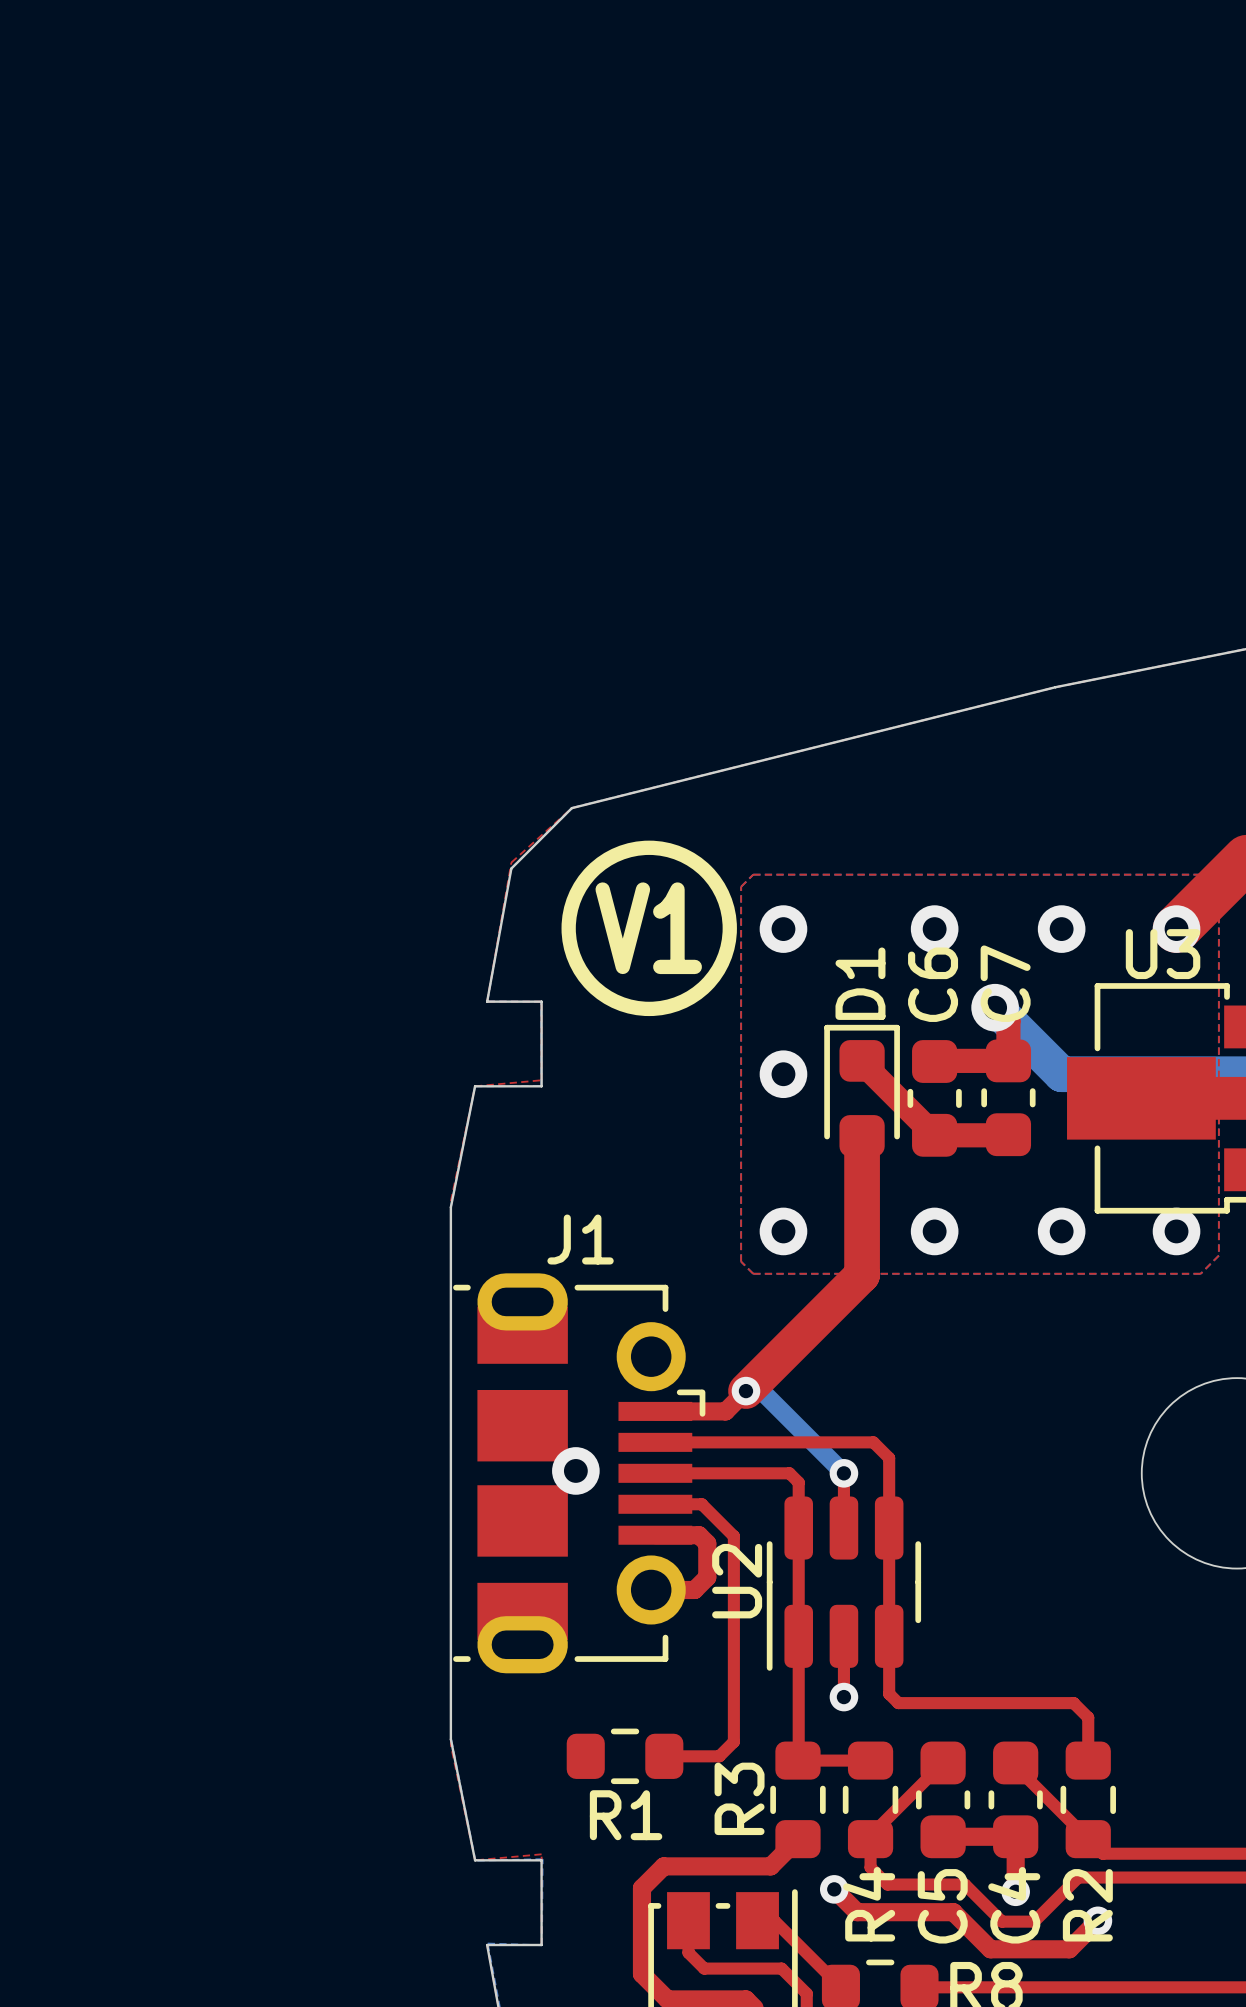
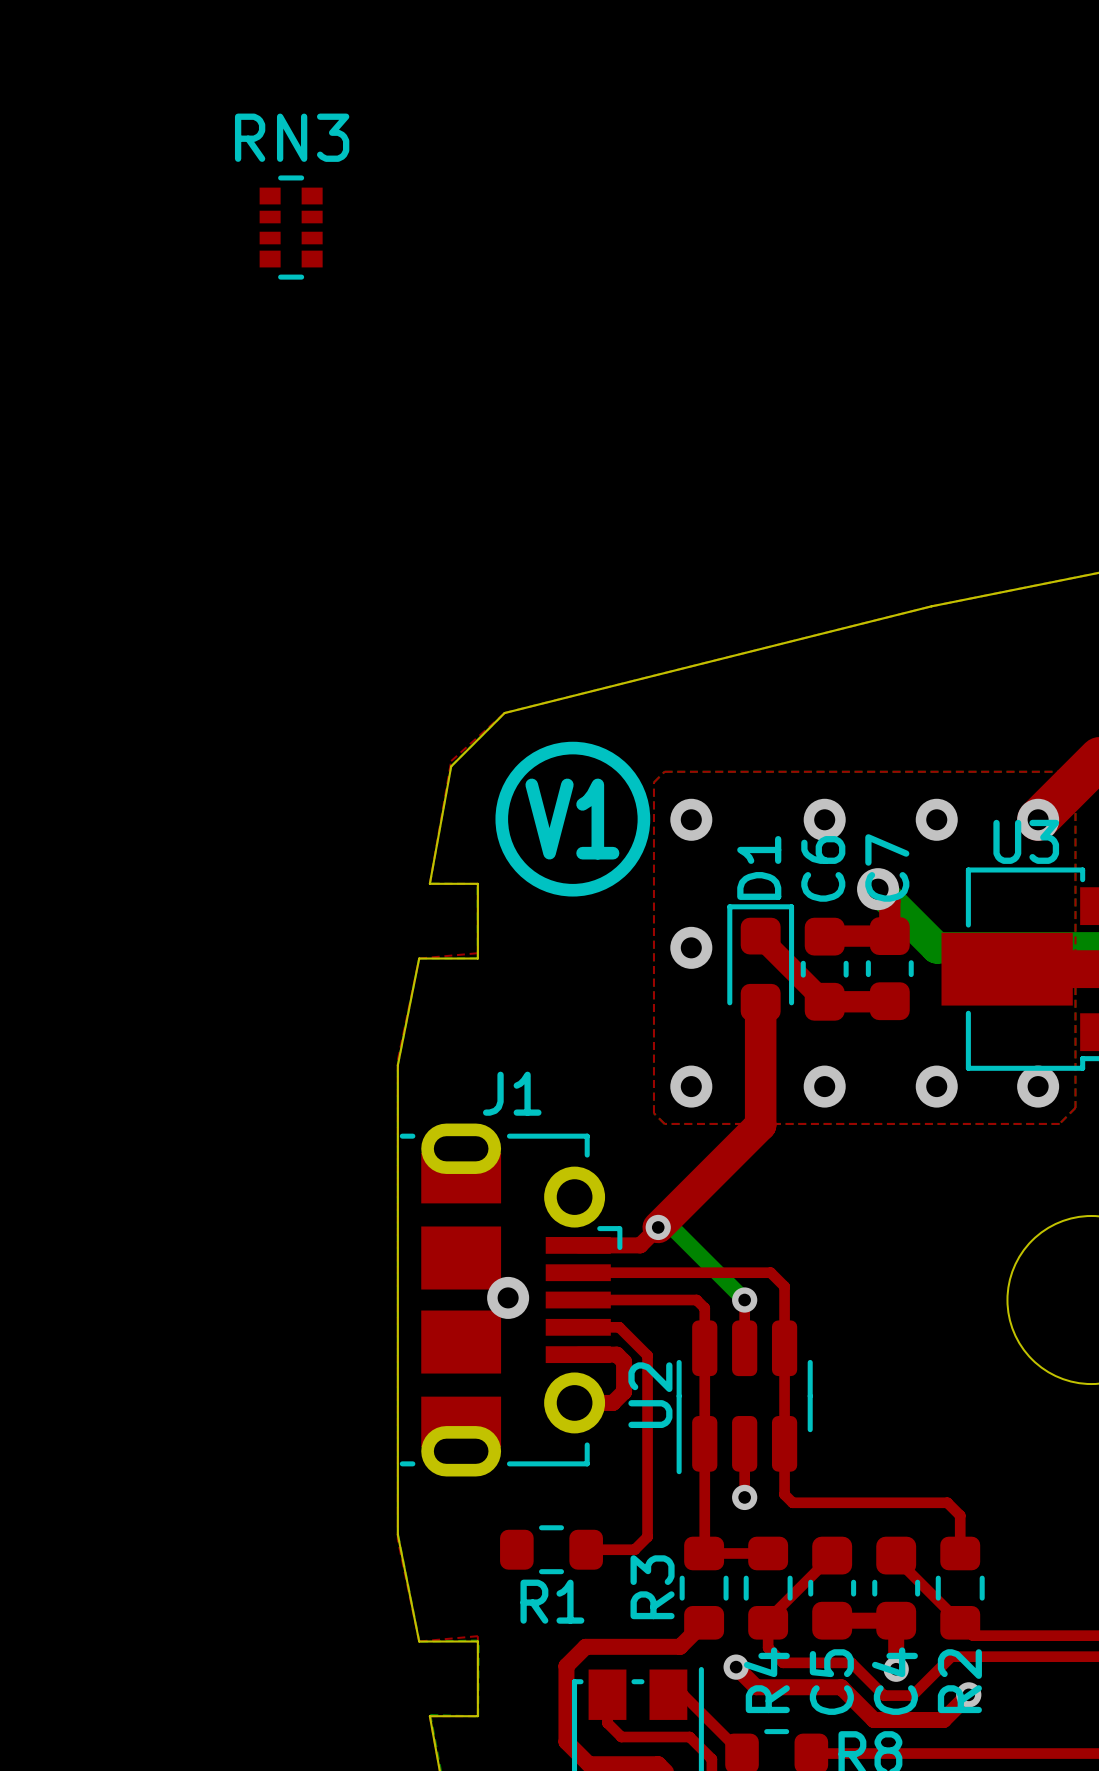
RN3: none -> (291, 227)

